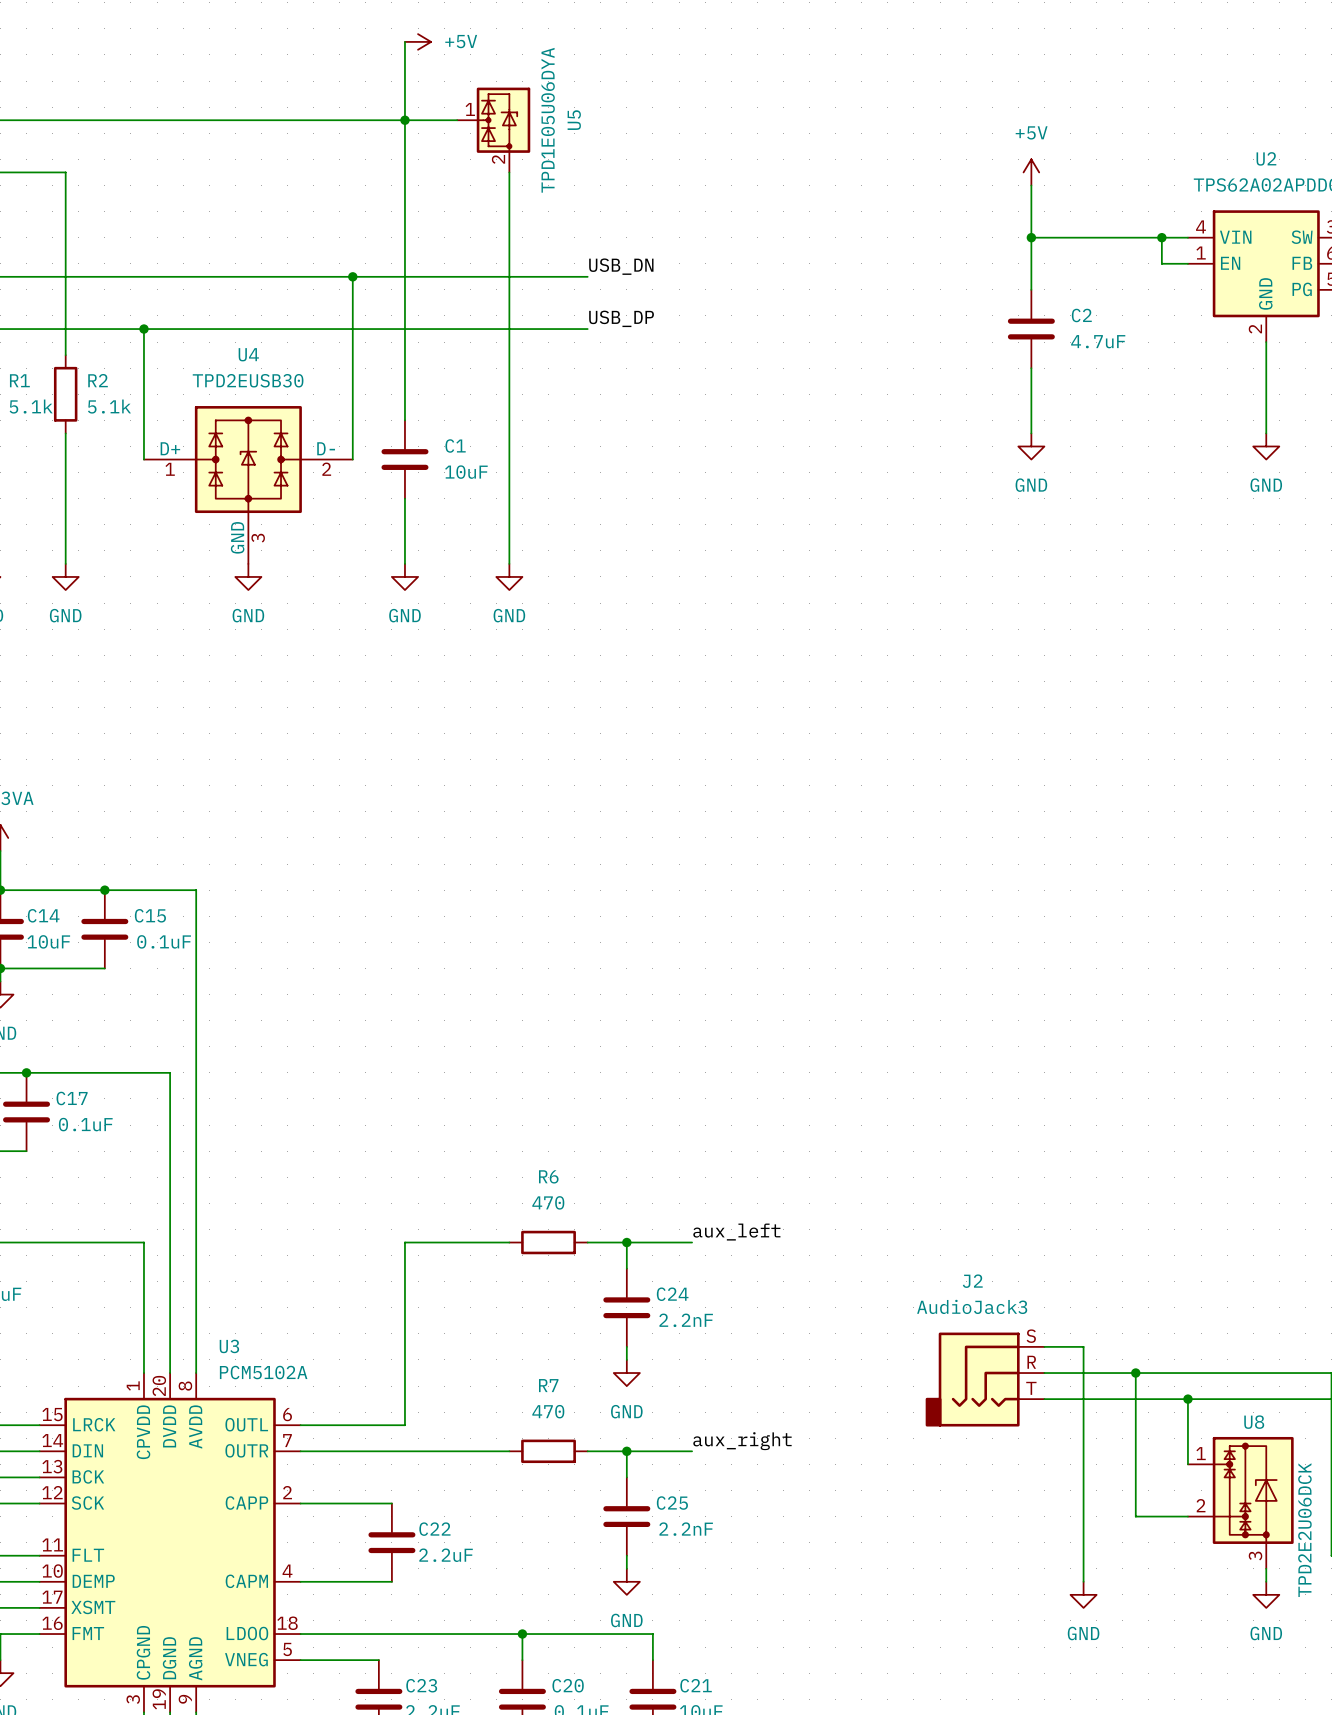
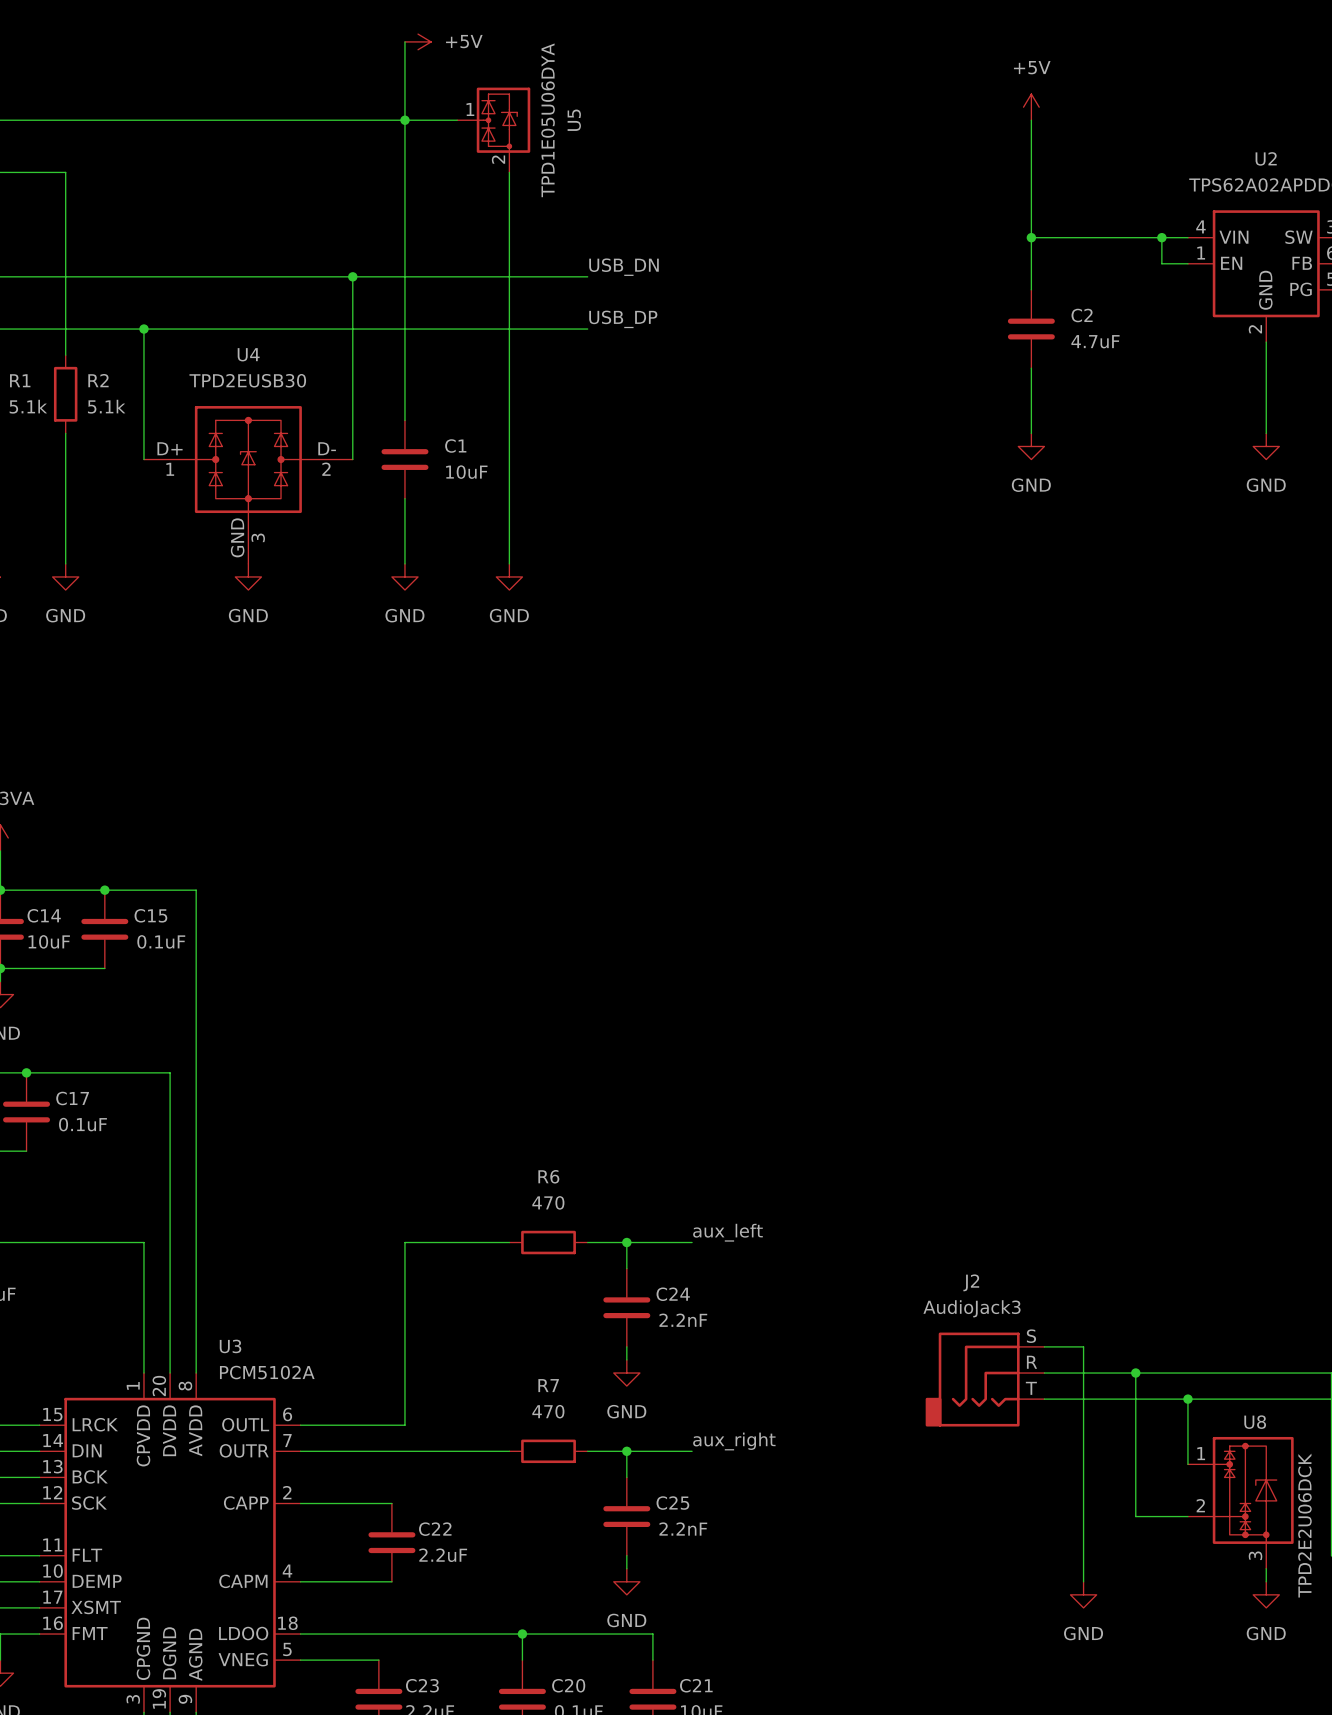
wire: none -> (1031, 120) (1031, 185)
power symbol position: +5V (1031, 172) -> +5V (1031, 107)

